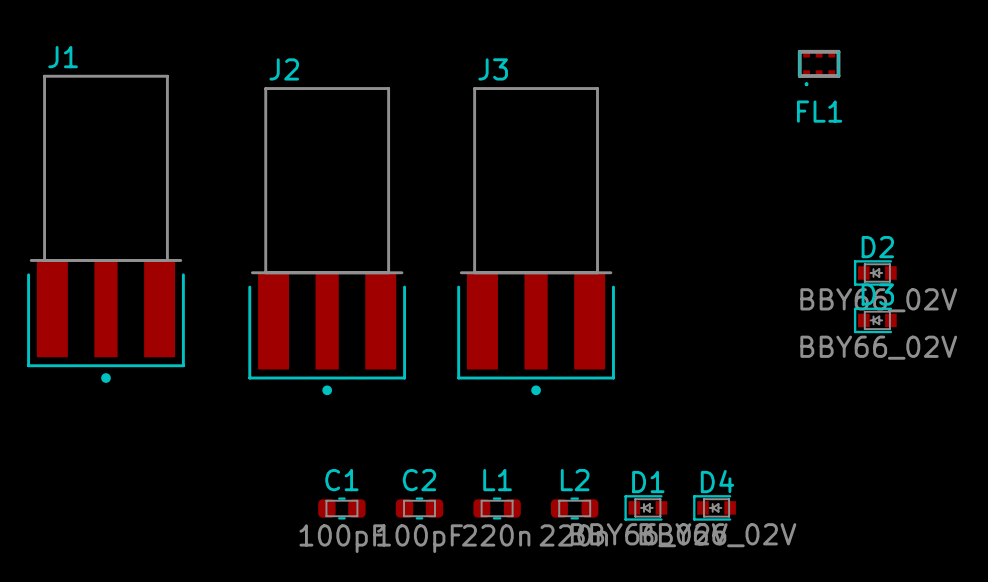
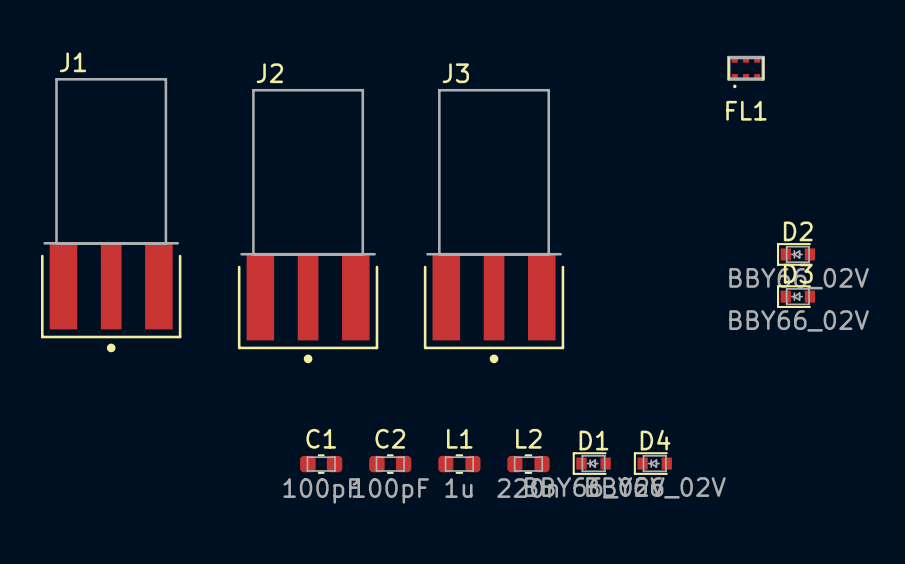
L1 value: 220n (496, 535) -> 1u (458, 488)

